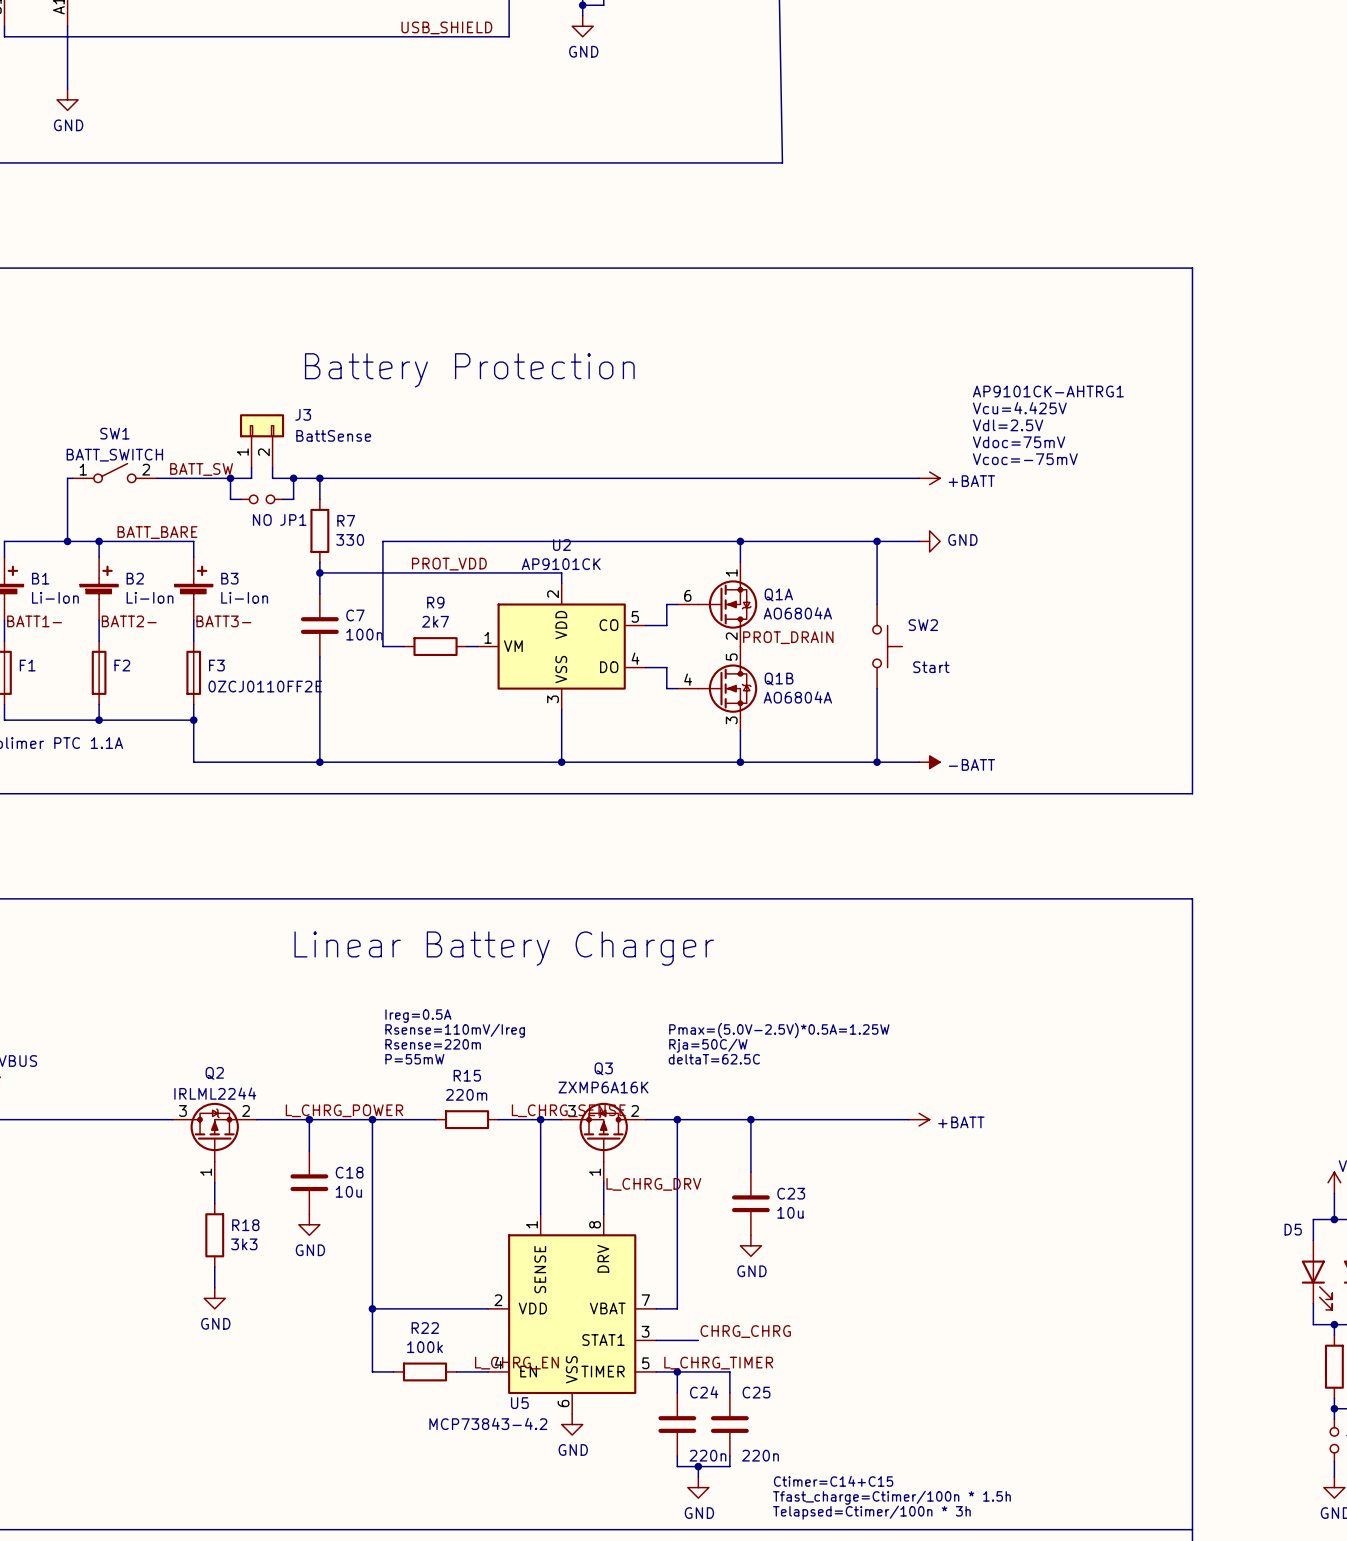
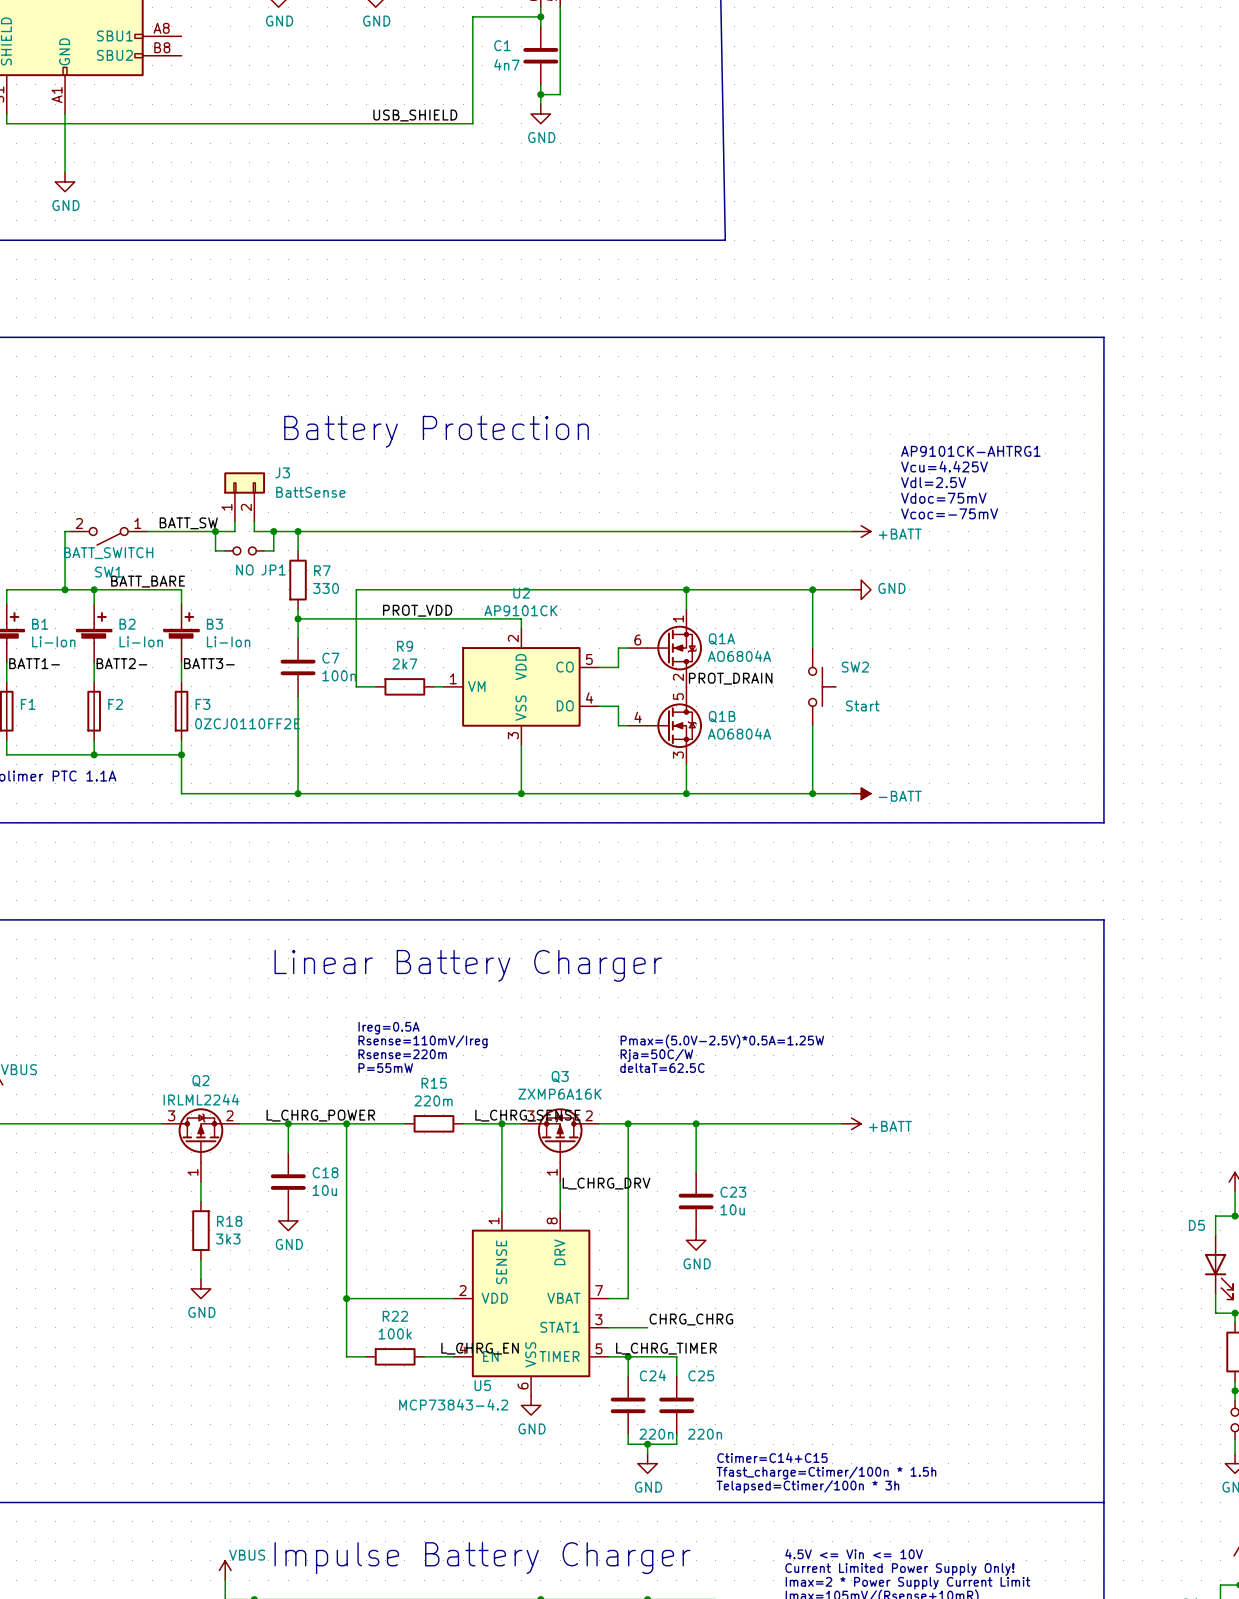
SW1 rotation: 0° (114, 473) -> 180° (108, 536)

